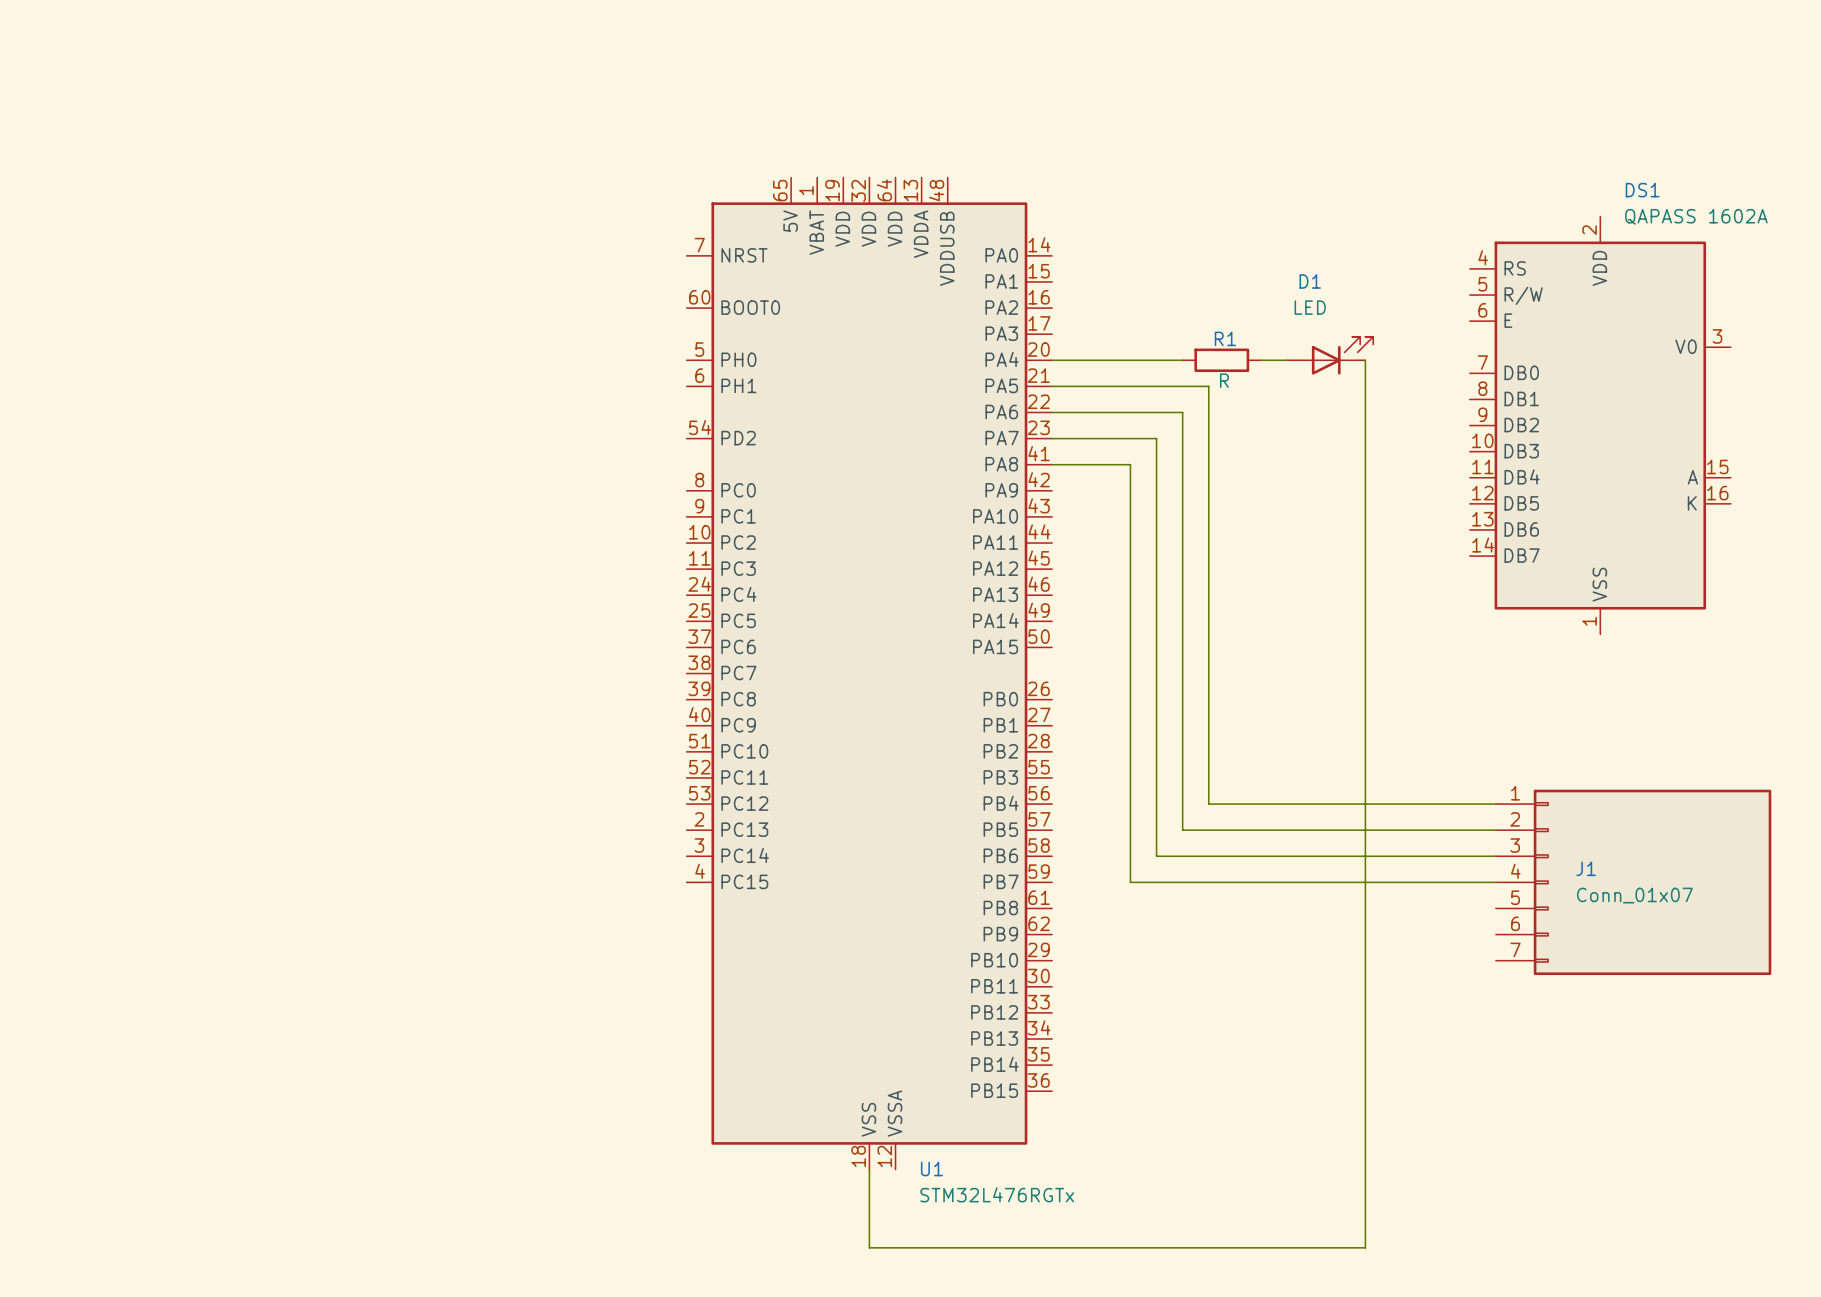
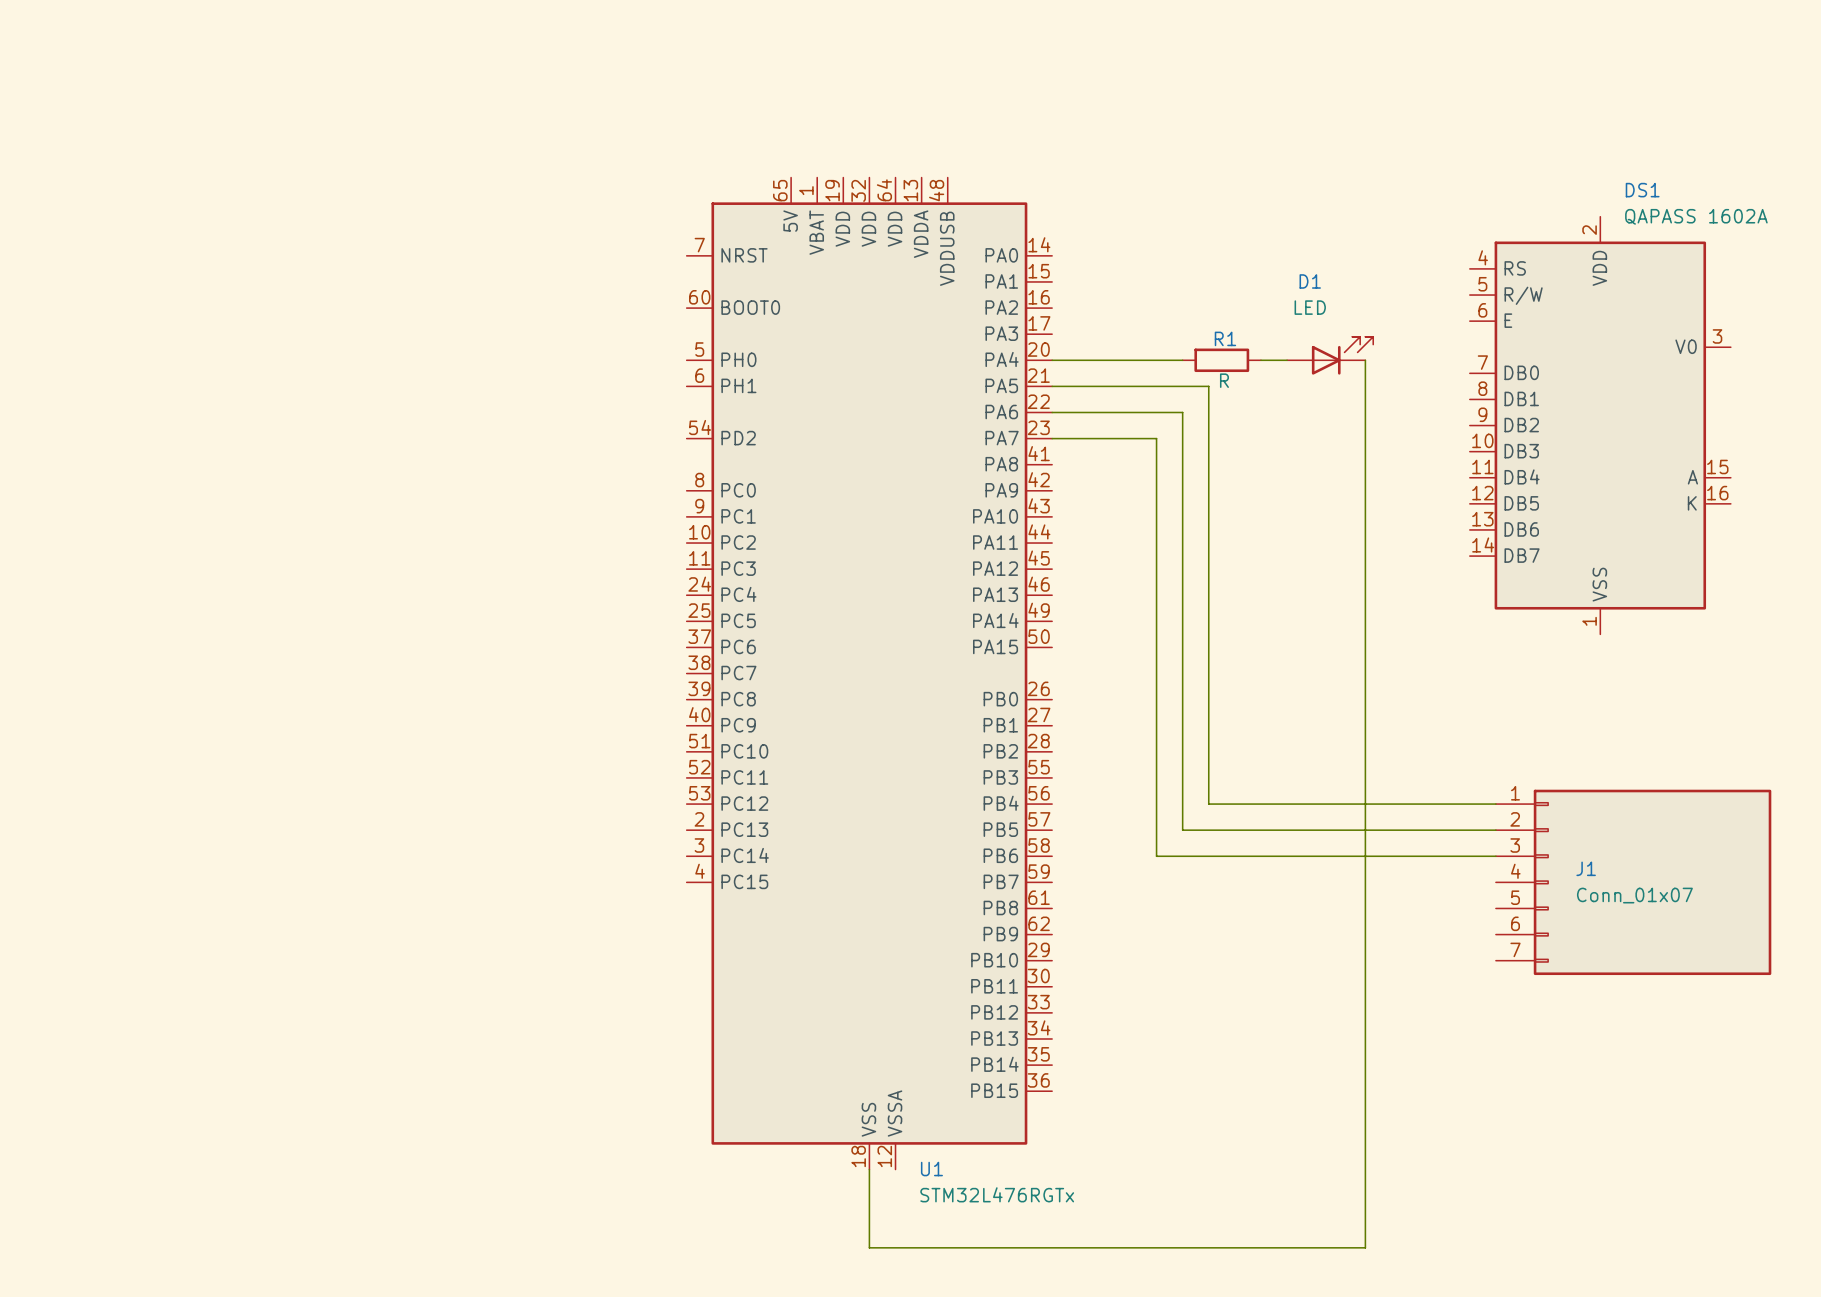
wire: (1052, 464) (1130, 464) (1130, 882) (1495, 882) -> none

